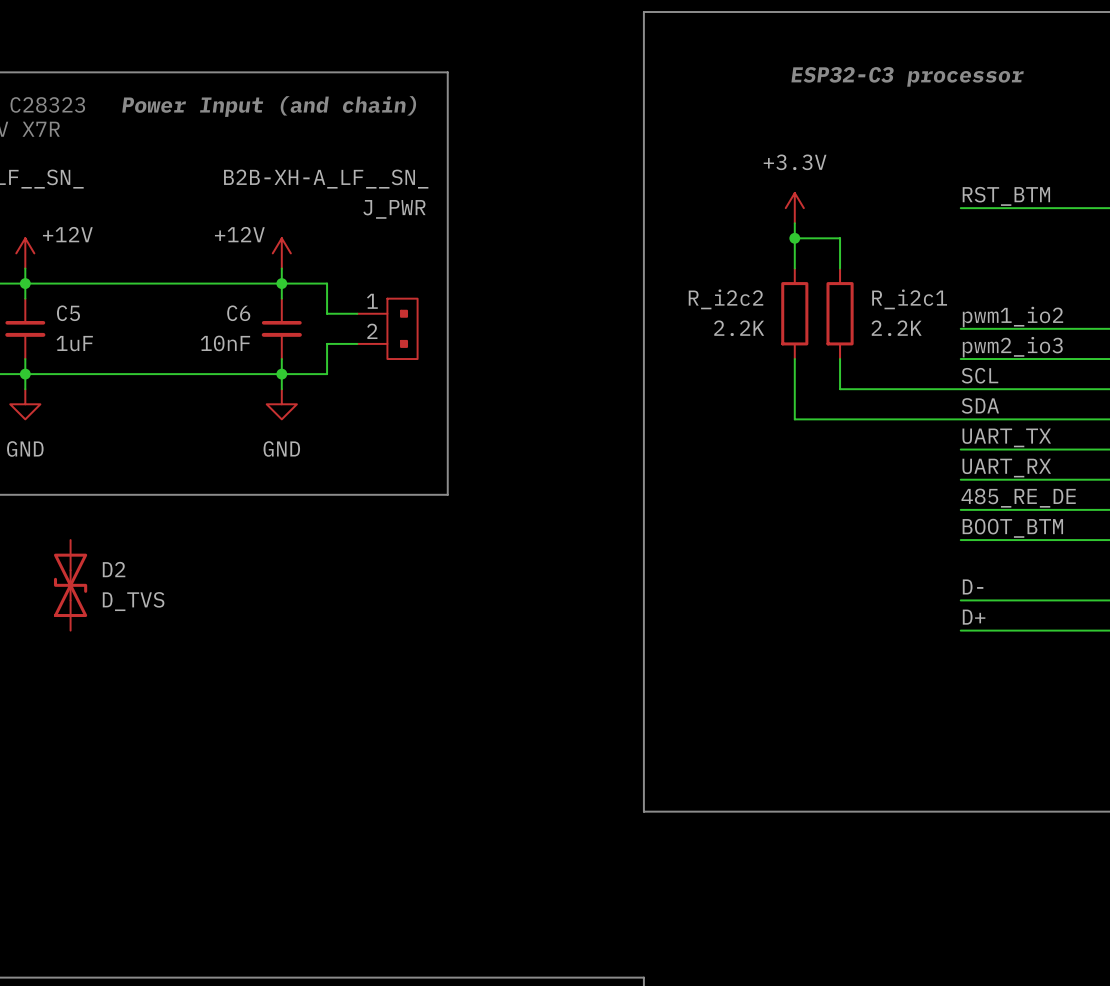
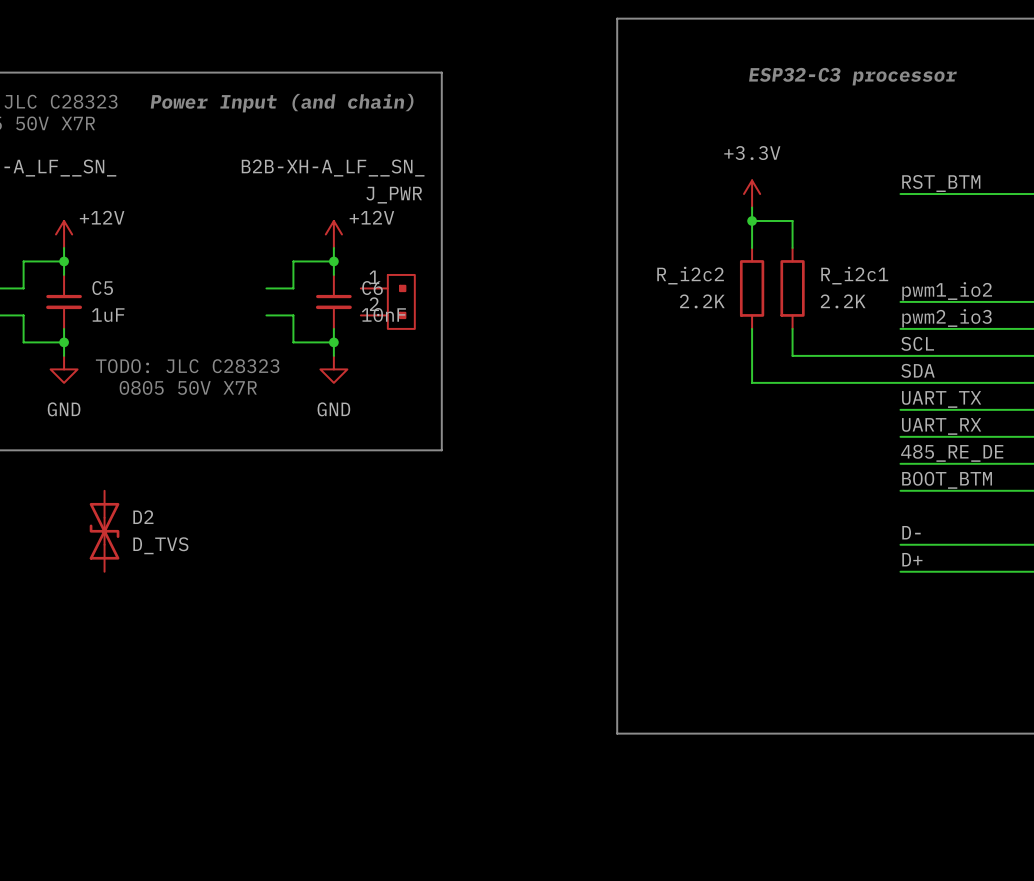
power symbol text position: +12V (239, 234) -> +12V (371, 217)
power symbol position: +12V (281, 253) -> +12V (333, 234)
wire: (281, 268) (281, 283) (25, 283) -> none
wire: none -> (333, 247) (333, 261)
junction position: (281, 283) -> (333, 261)
wire: none -> (293, 274) (293, 288) (266, 288)
wire: (327, 298) (327, 313) (357, 313) -> none
C6 name position: C6 (238, 313) -> C6 (372, 288)
C6 position: (281, 328) -> (333, 301)
C6 value position: 10nF (225, 343) -> 10nF (383, 314)
wire: none -> (266, 315) (293, 315) (293, 328)
wire: (357, 343) (327, 343) (327, 359) -> none
wire: (25, 374) (281, 374) (281, 389) -> none
junction position: (281, 374) -> (333, 342)
wire: none -> (333, 342) (333, 355)
text: none -> TODO: JLC C28323 (187, 366)
power symbol position: GND (281, 404) -> GND (333, 369)
text: none -> 0805 50V X7R (188, 387)

